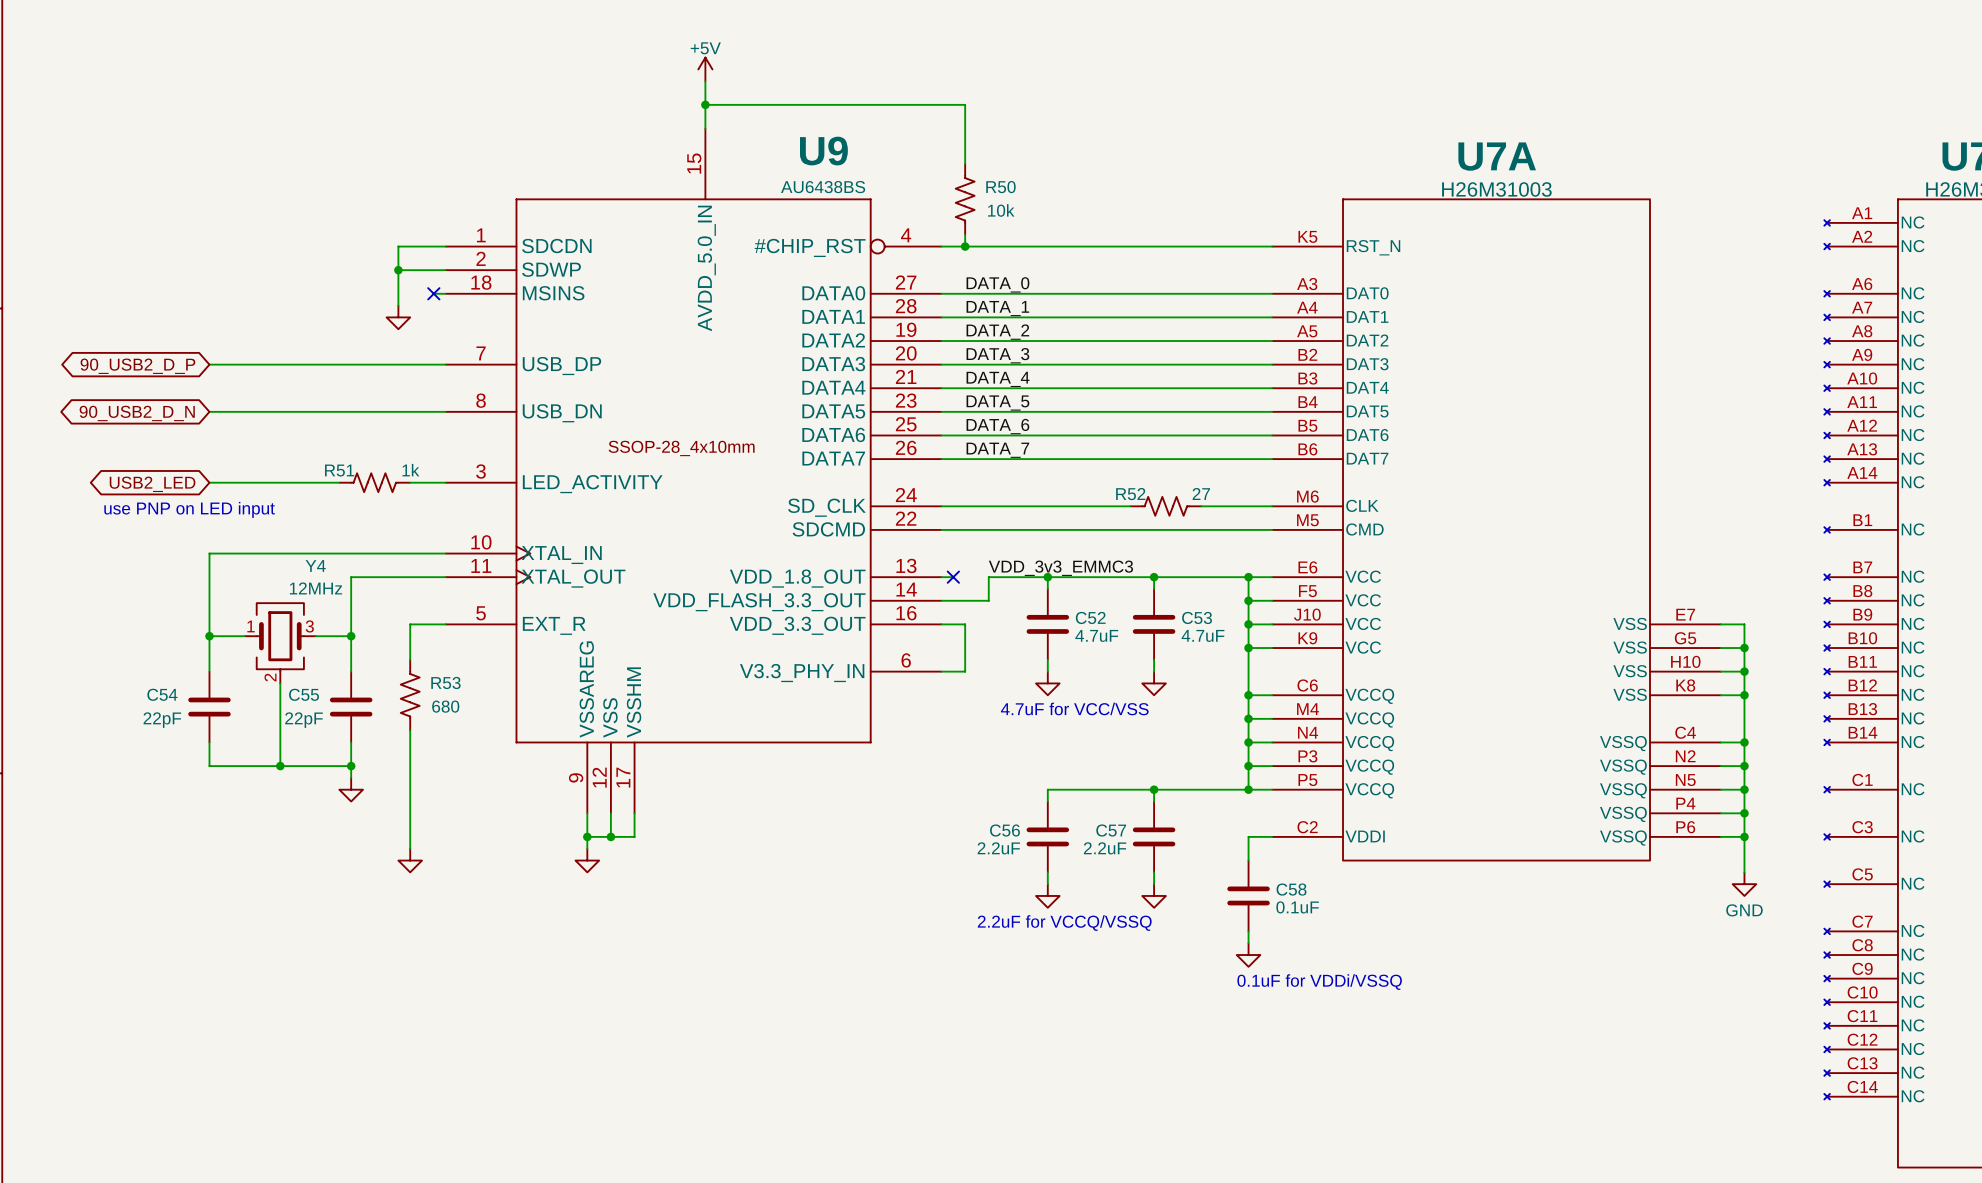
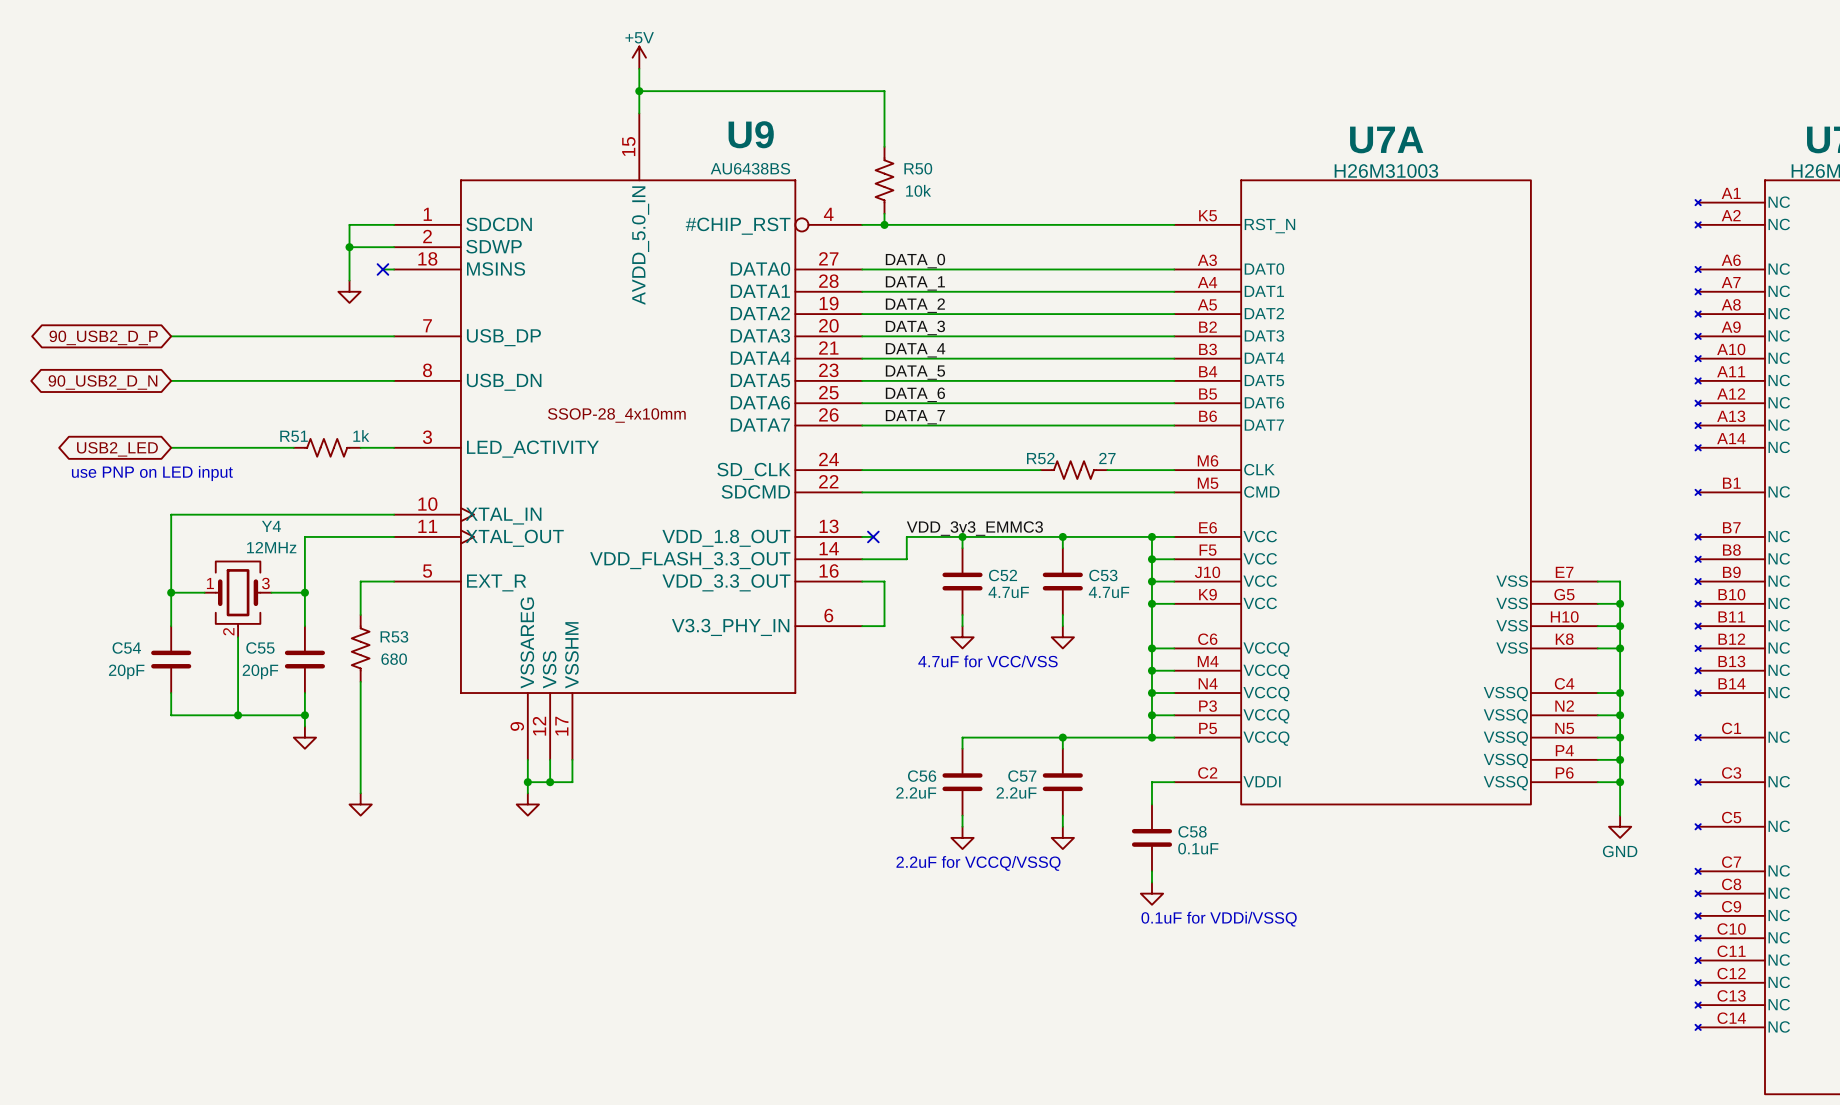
C54 value: 22pF (162, 720) -> 20pF (126, 671)
C55 value: 22pF (304, 720) -> 20pF (260, 671)

